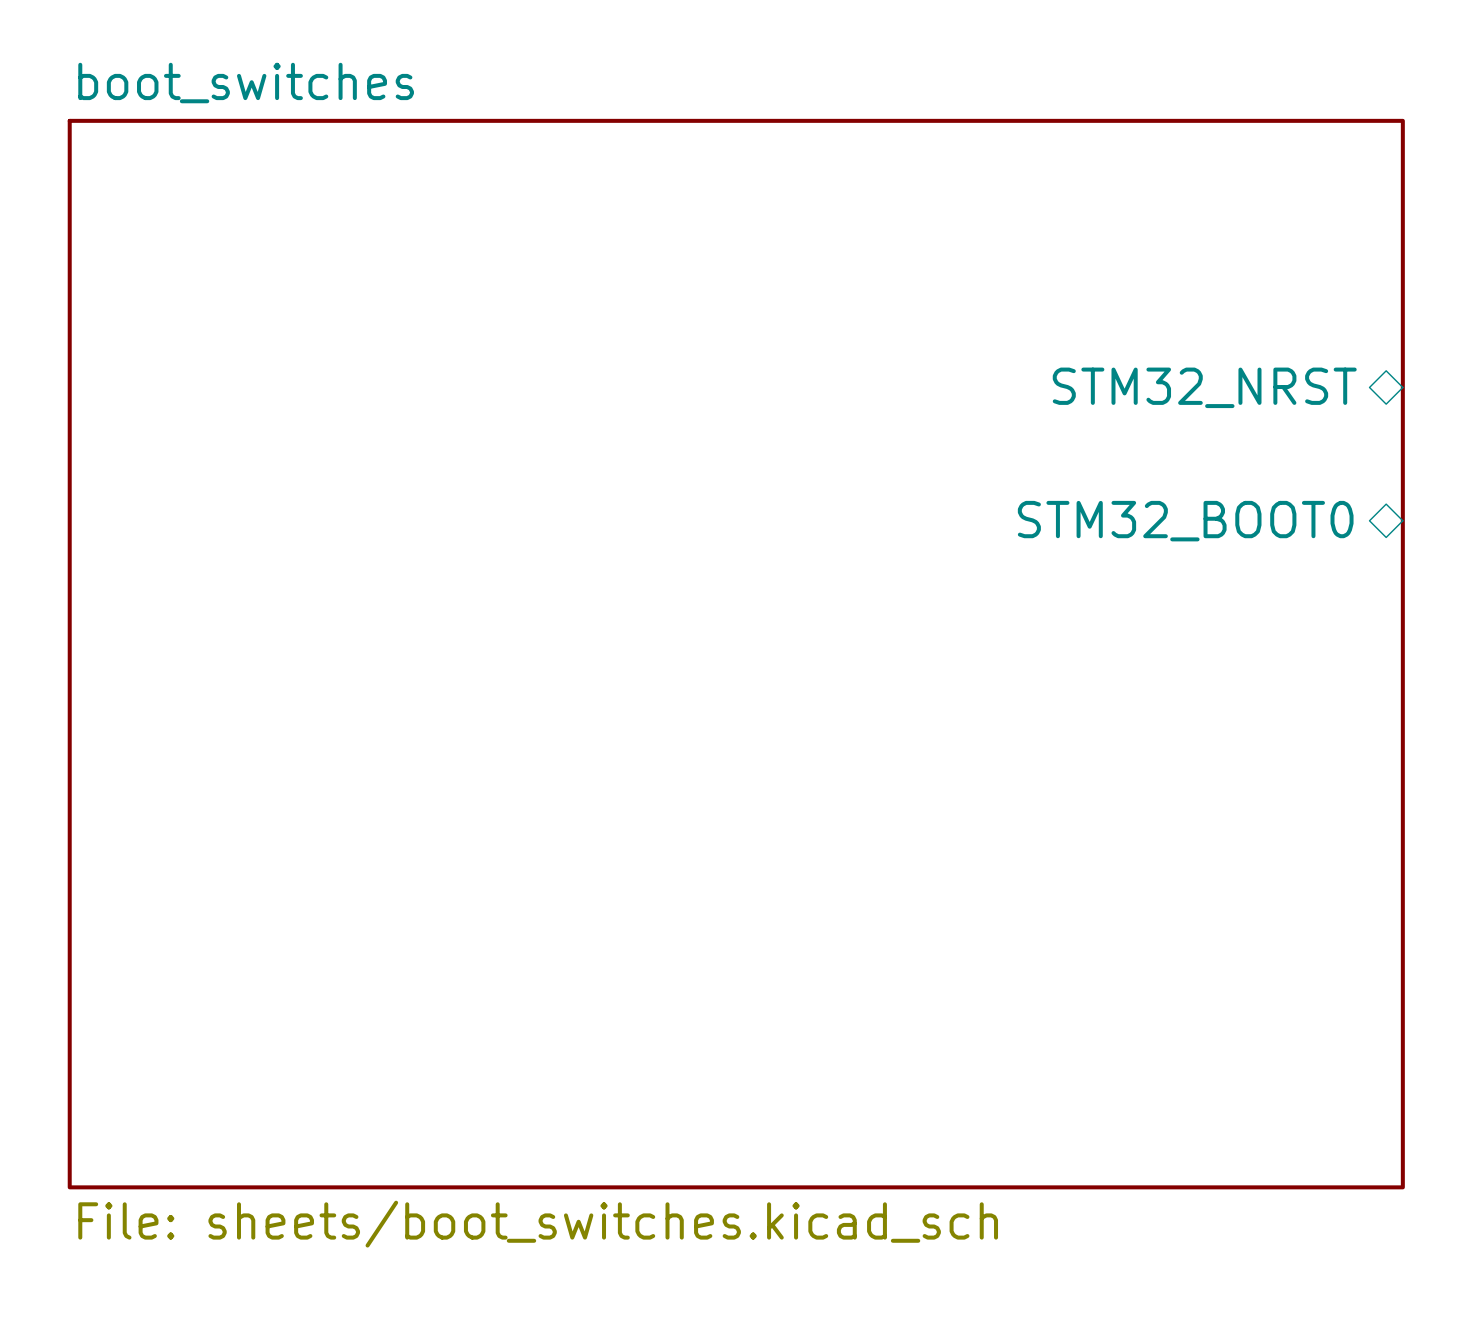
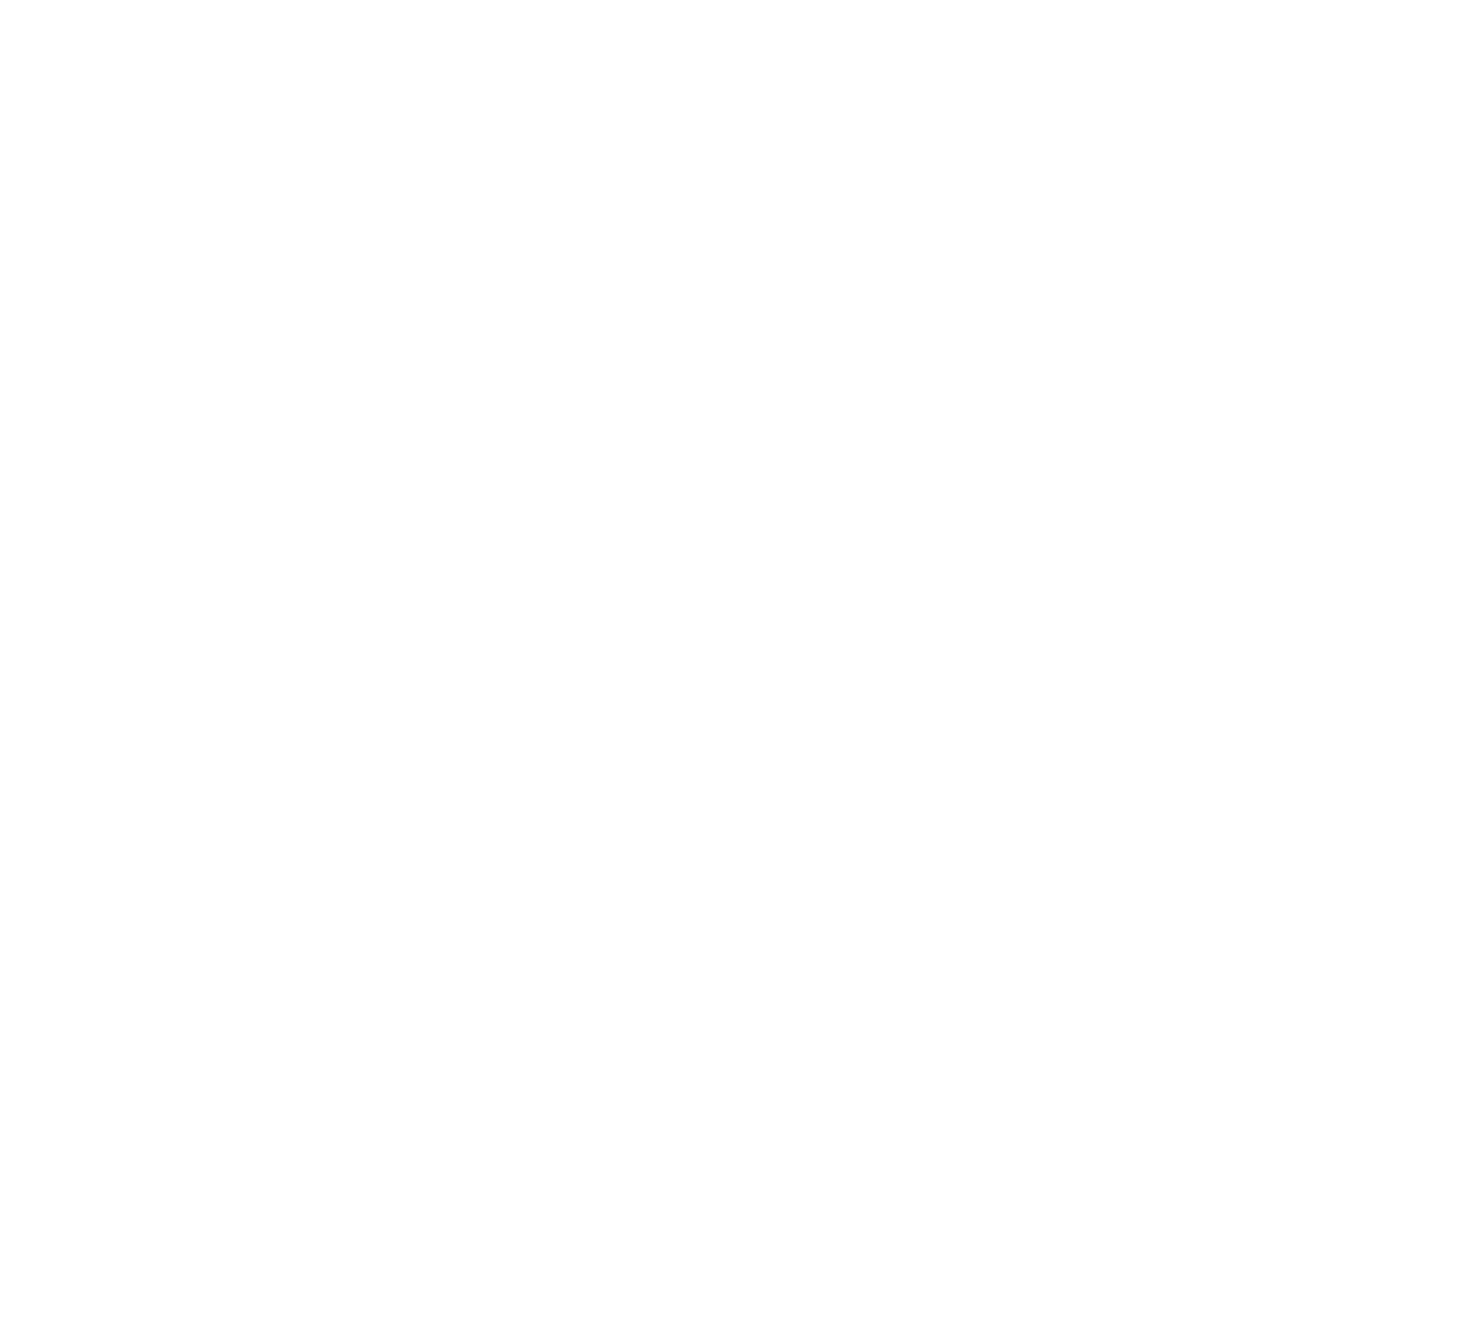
sheet pin: STM32_NRST (1204, 387) -> none
sheet pin: STM32_BOOT0 (1185, 521) -> none
sheet boot_switches: File: sheets/boot_switches.kicad_sch (736, 654) -> none

